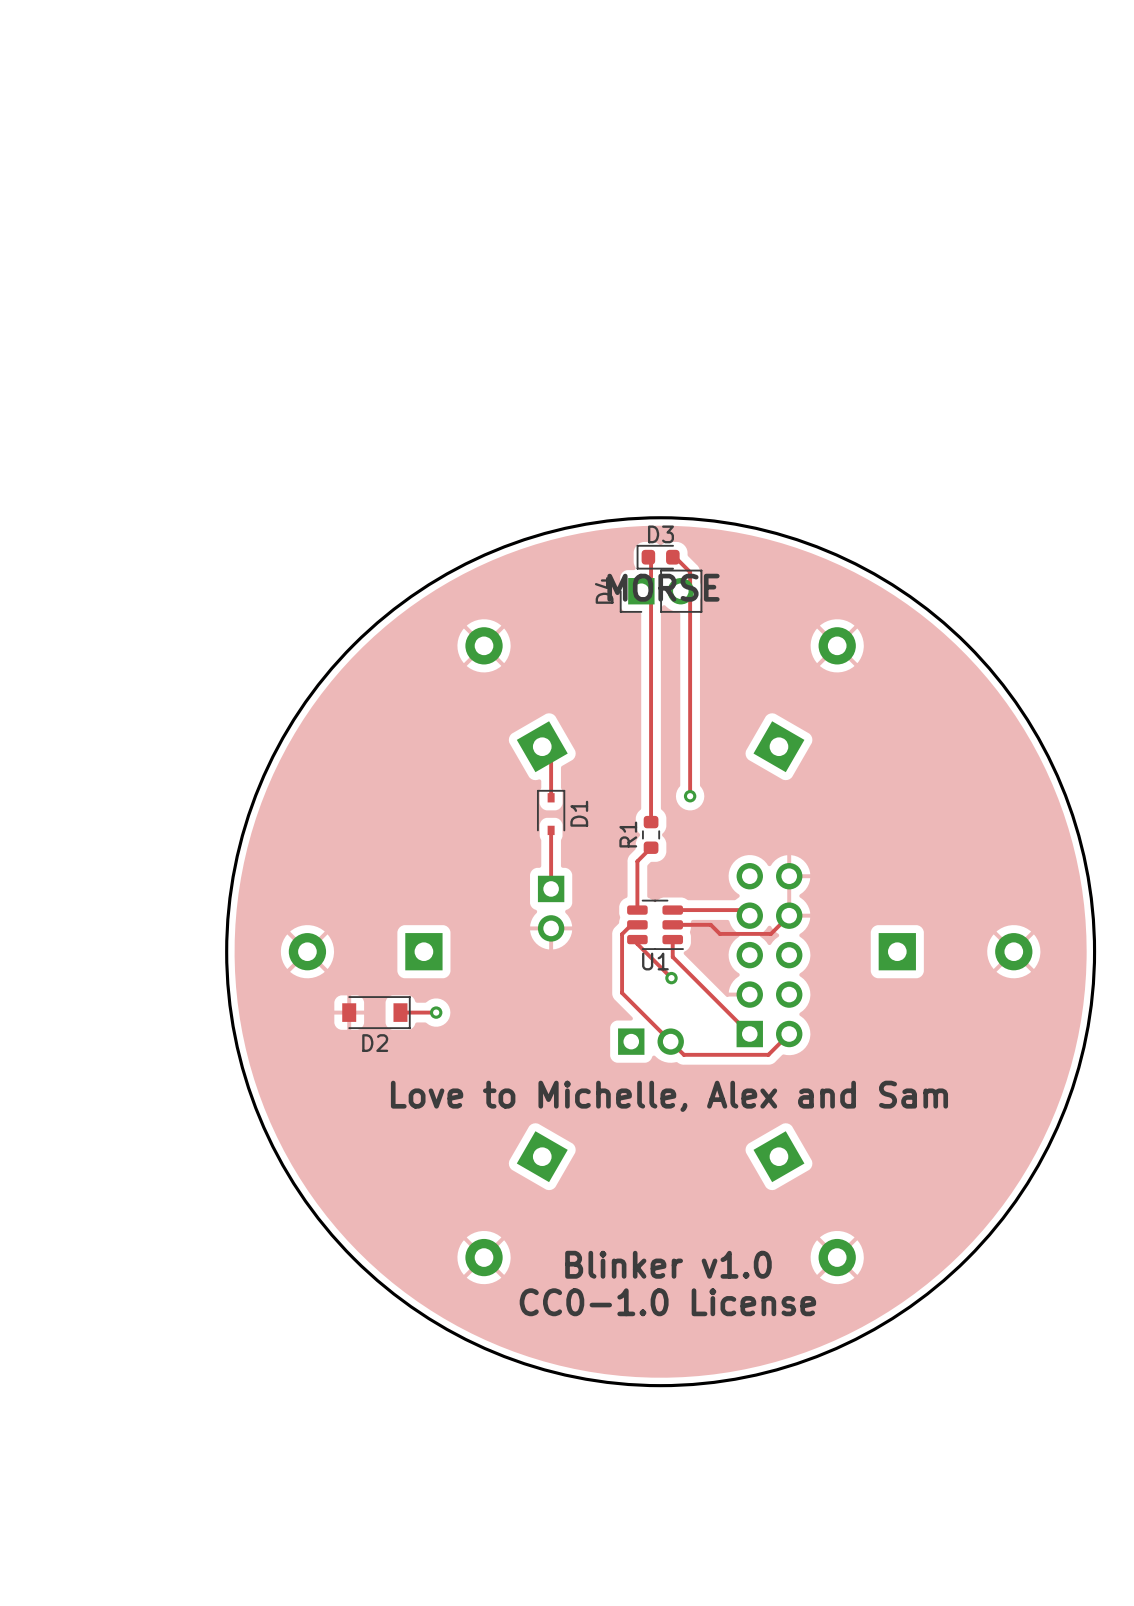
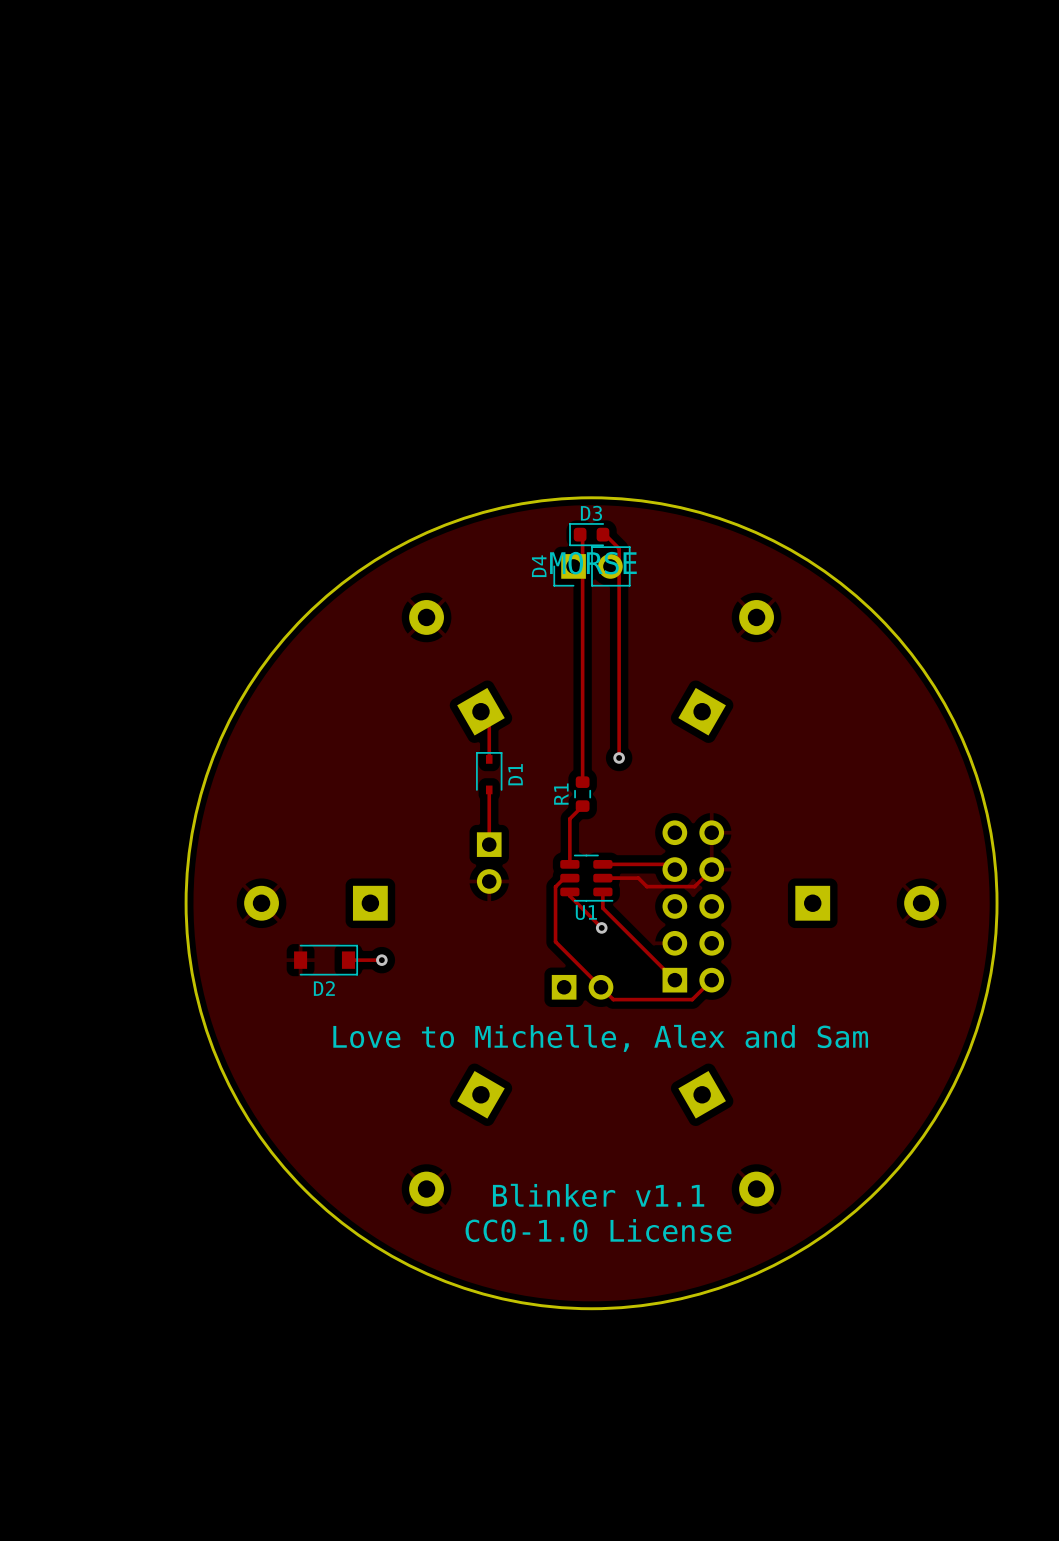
text: Blinker v1.0 (668, 1264) -> Blinker v1.1 (598, 1195)

